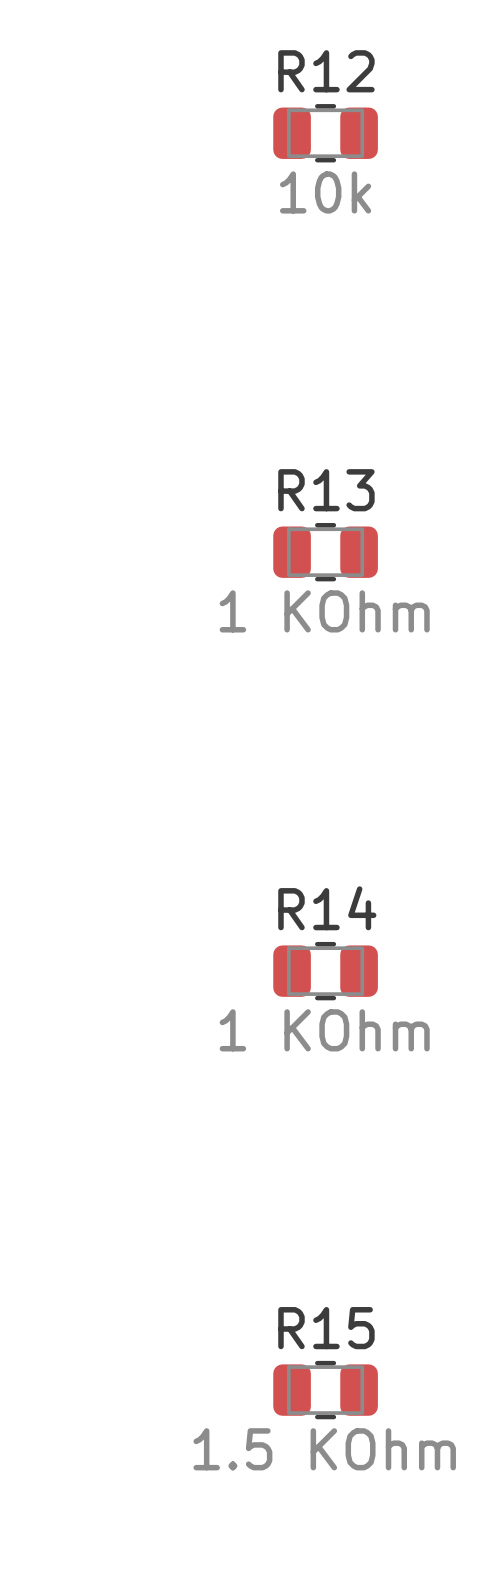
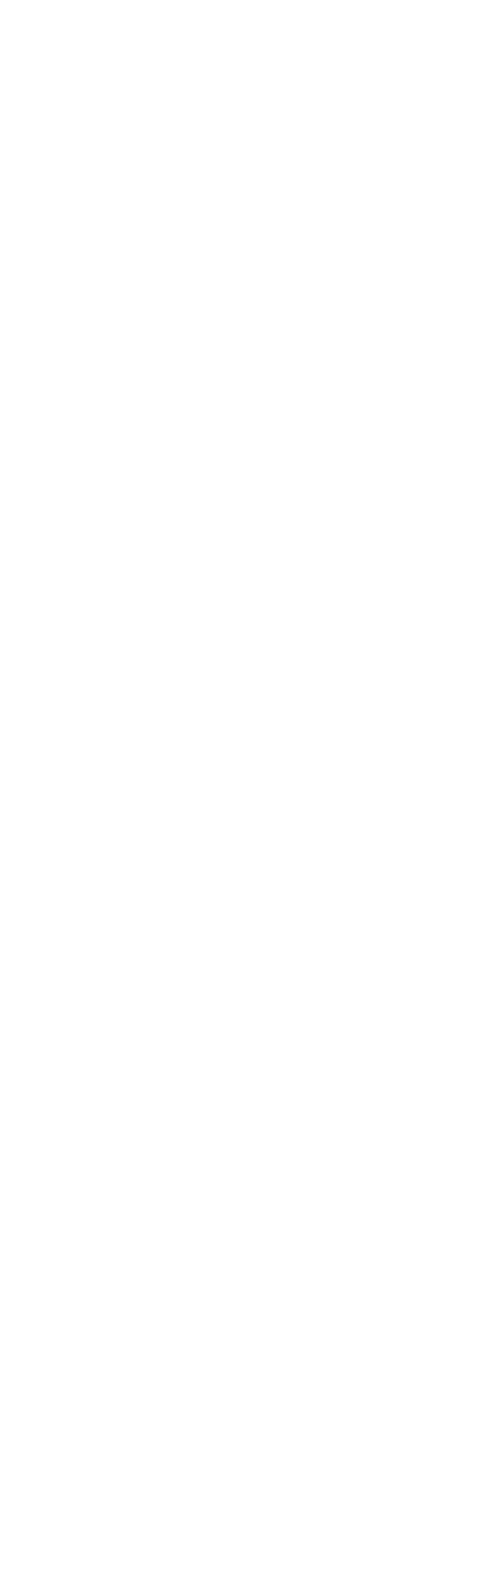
R12: 10k (325, 133) -> none
R13: 1 KOhm (325, 552) -> none
R14: 1 KOhm (325, 971) -> none
R15: 1.5 KOhm (325, 1390) -> none

